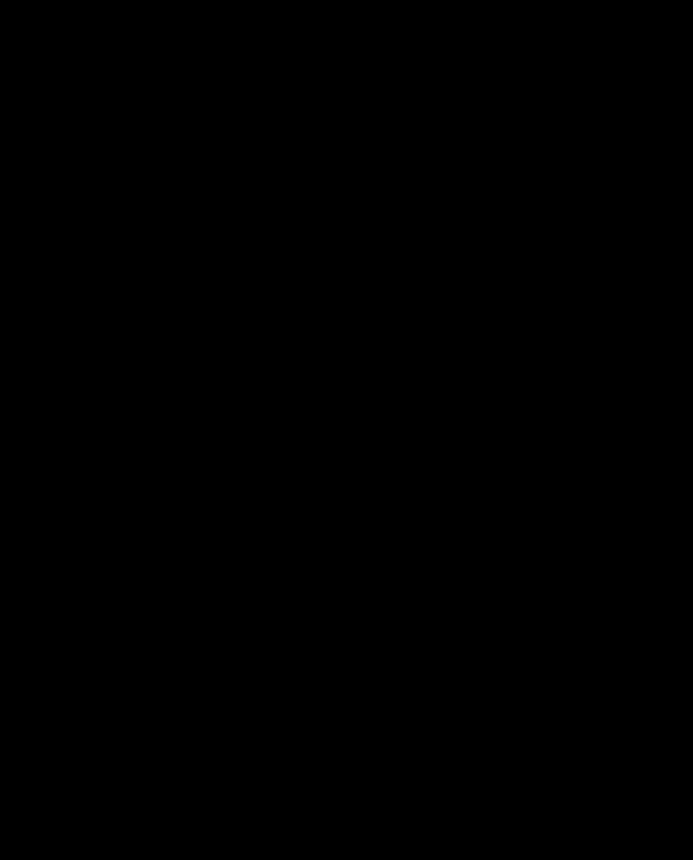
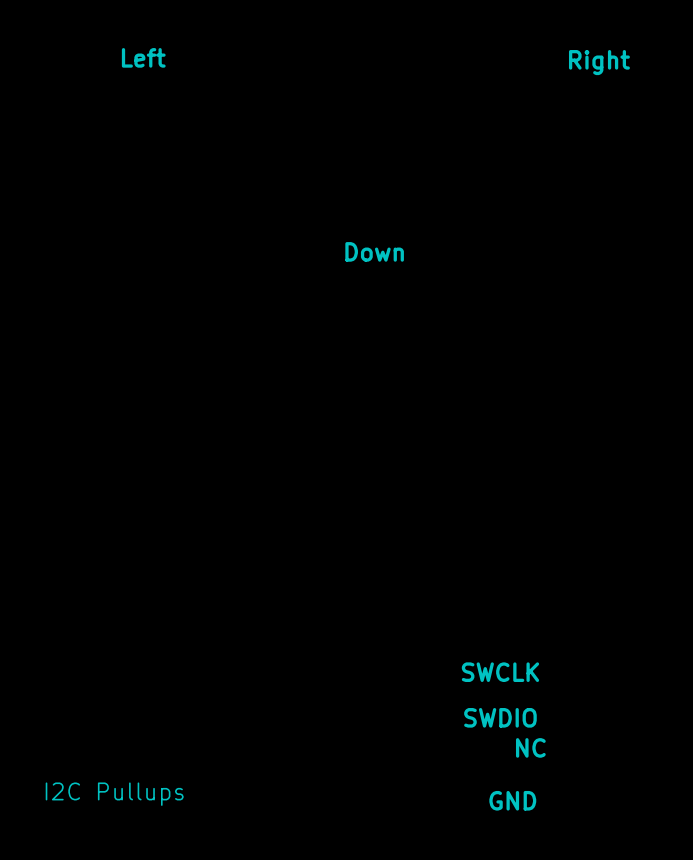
text: none -> Left (143, 57)
text: none -> Right (599, 62)
text: none -> Down (374, 251)
text: none -> SWCLK (500, 672)
text: none -> SWDIO (500, 717)
text: none -> NC (530, 747)
text: none -> I2C Pullups (114, 794)
text: none -> GND (512, 800)

